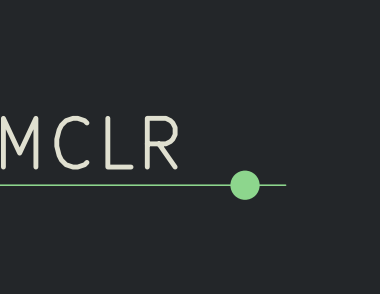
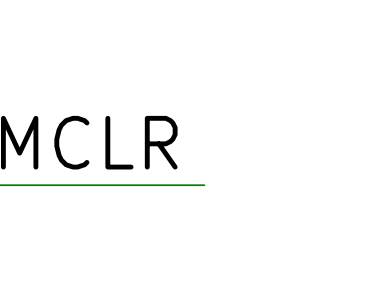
wire: (204, 185) (285, 185) -> none
junction: (245, 185) -> none

